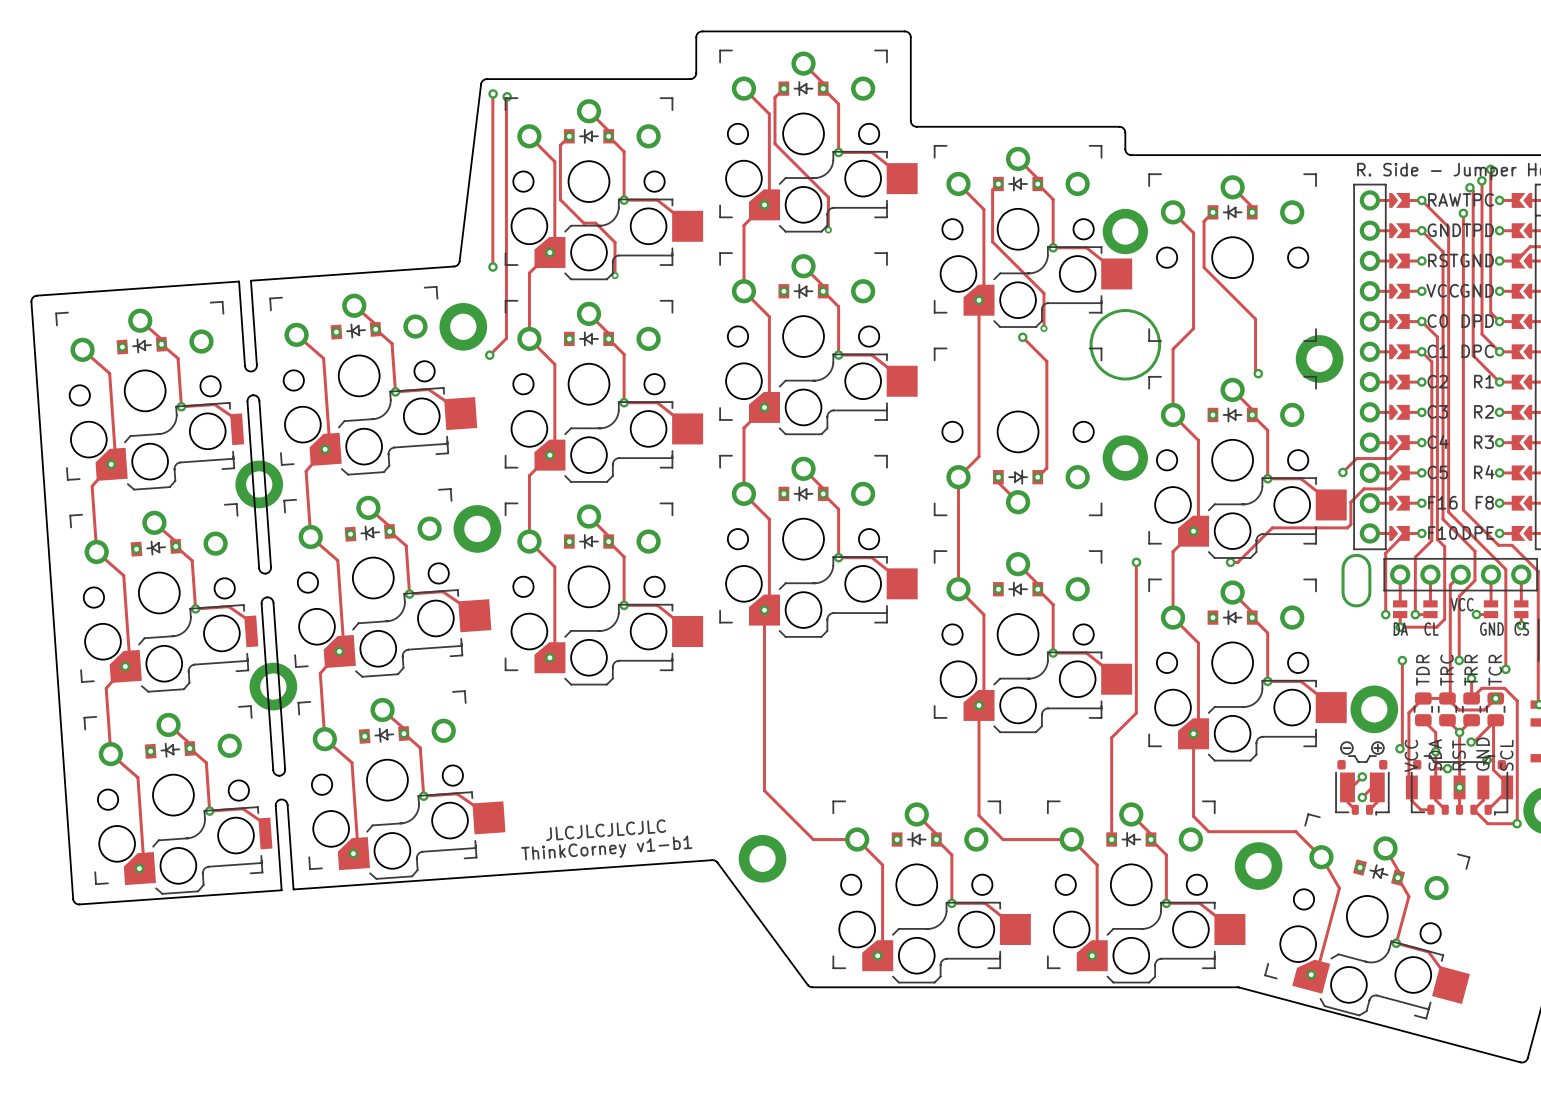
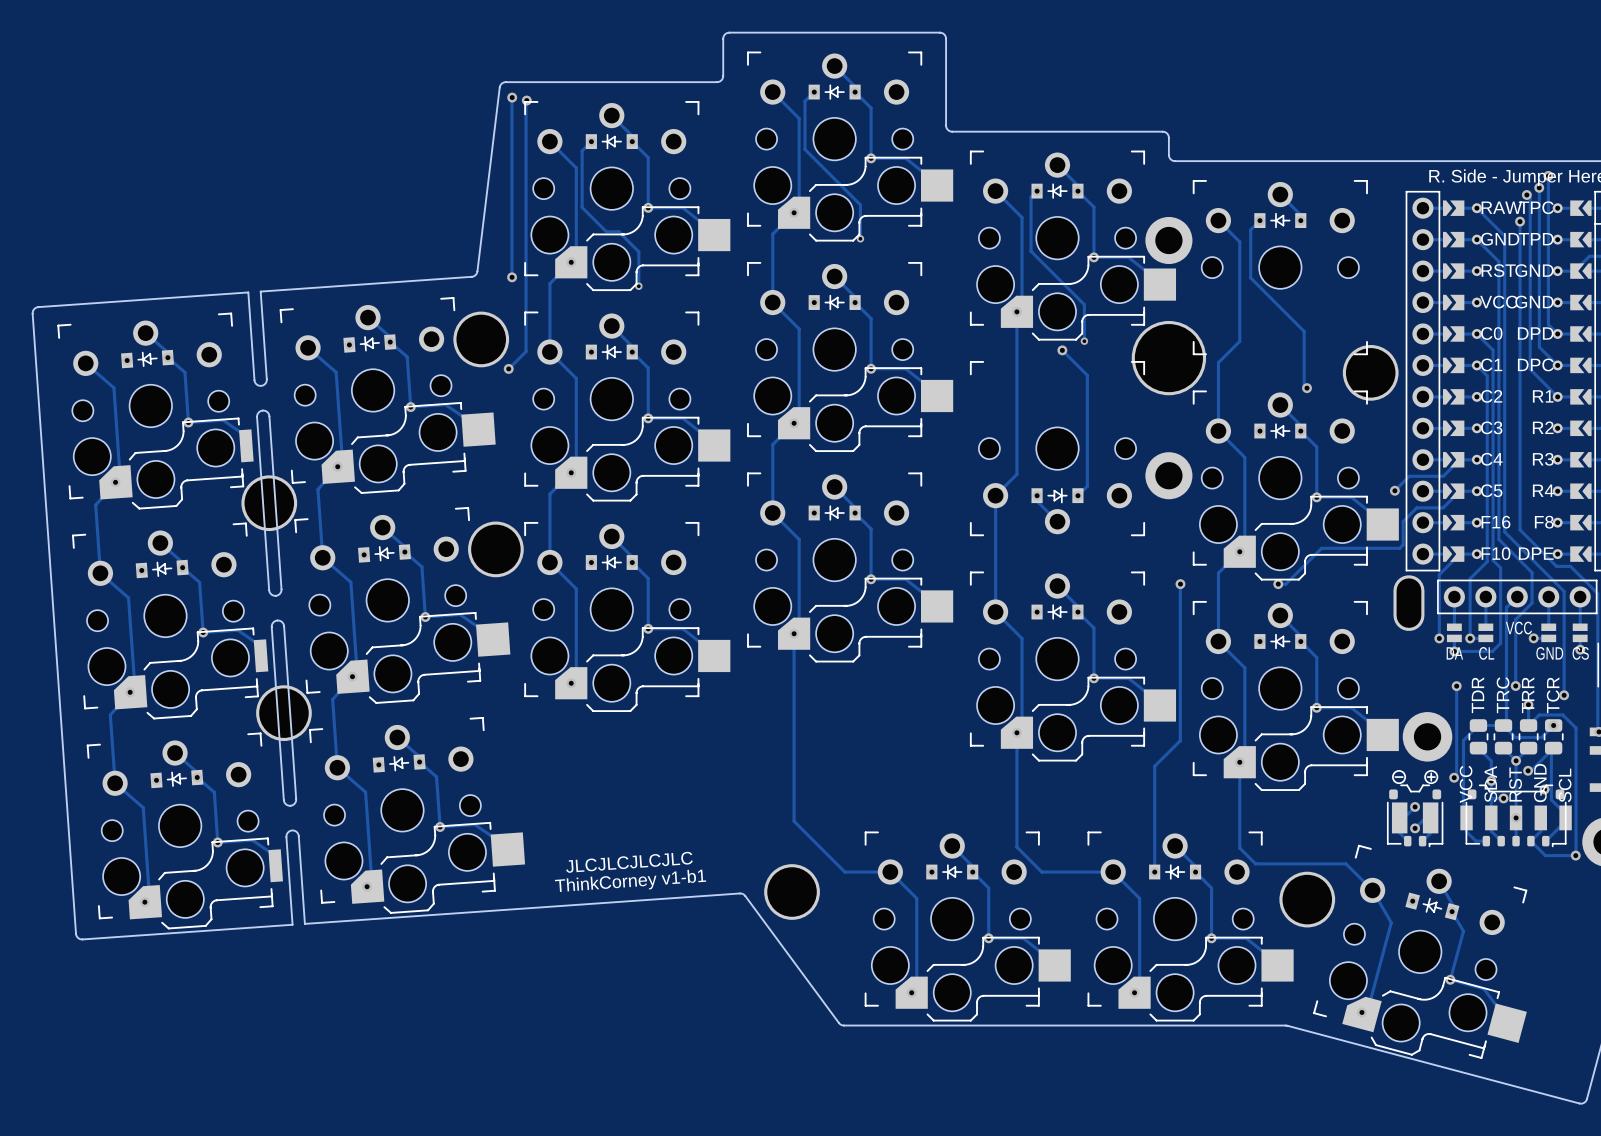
part footprint: [439, 302, 488, 351] -> [453, 311, 510, 368]
part footprint: [1295, 335, 1344, 383] -> [1342, 344, 1399, 401]
part footprint: [235, 460, 284, 509] -> [241, 475, 298, 532]
part footprint: [453, 505, 502, 553] -> [468, 521, 524, 578]
part footprint: [249, 662, 298, 711] -> [256, 685, 312, 742]
part footprint: [738, 834, 787, 883] -> [764, 864, 820, 920]
part footprint: [1234, 842, 1283, 890] -> [1279, 871, 1336, 928]

